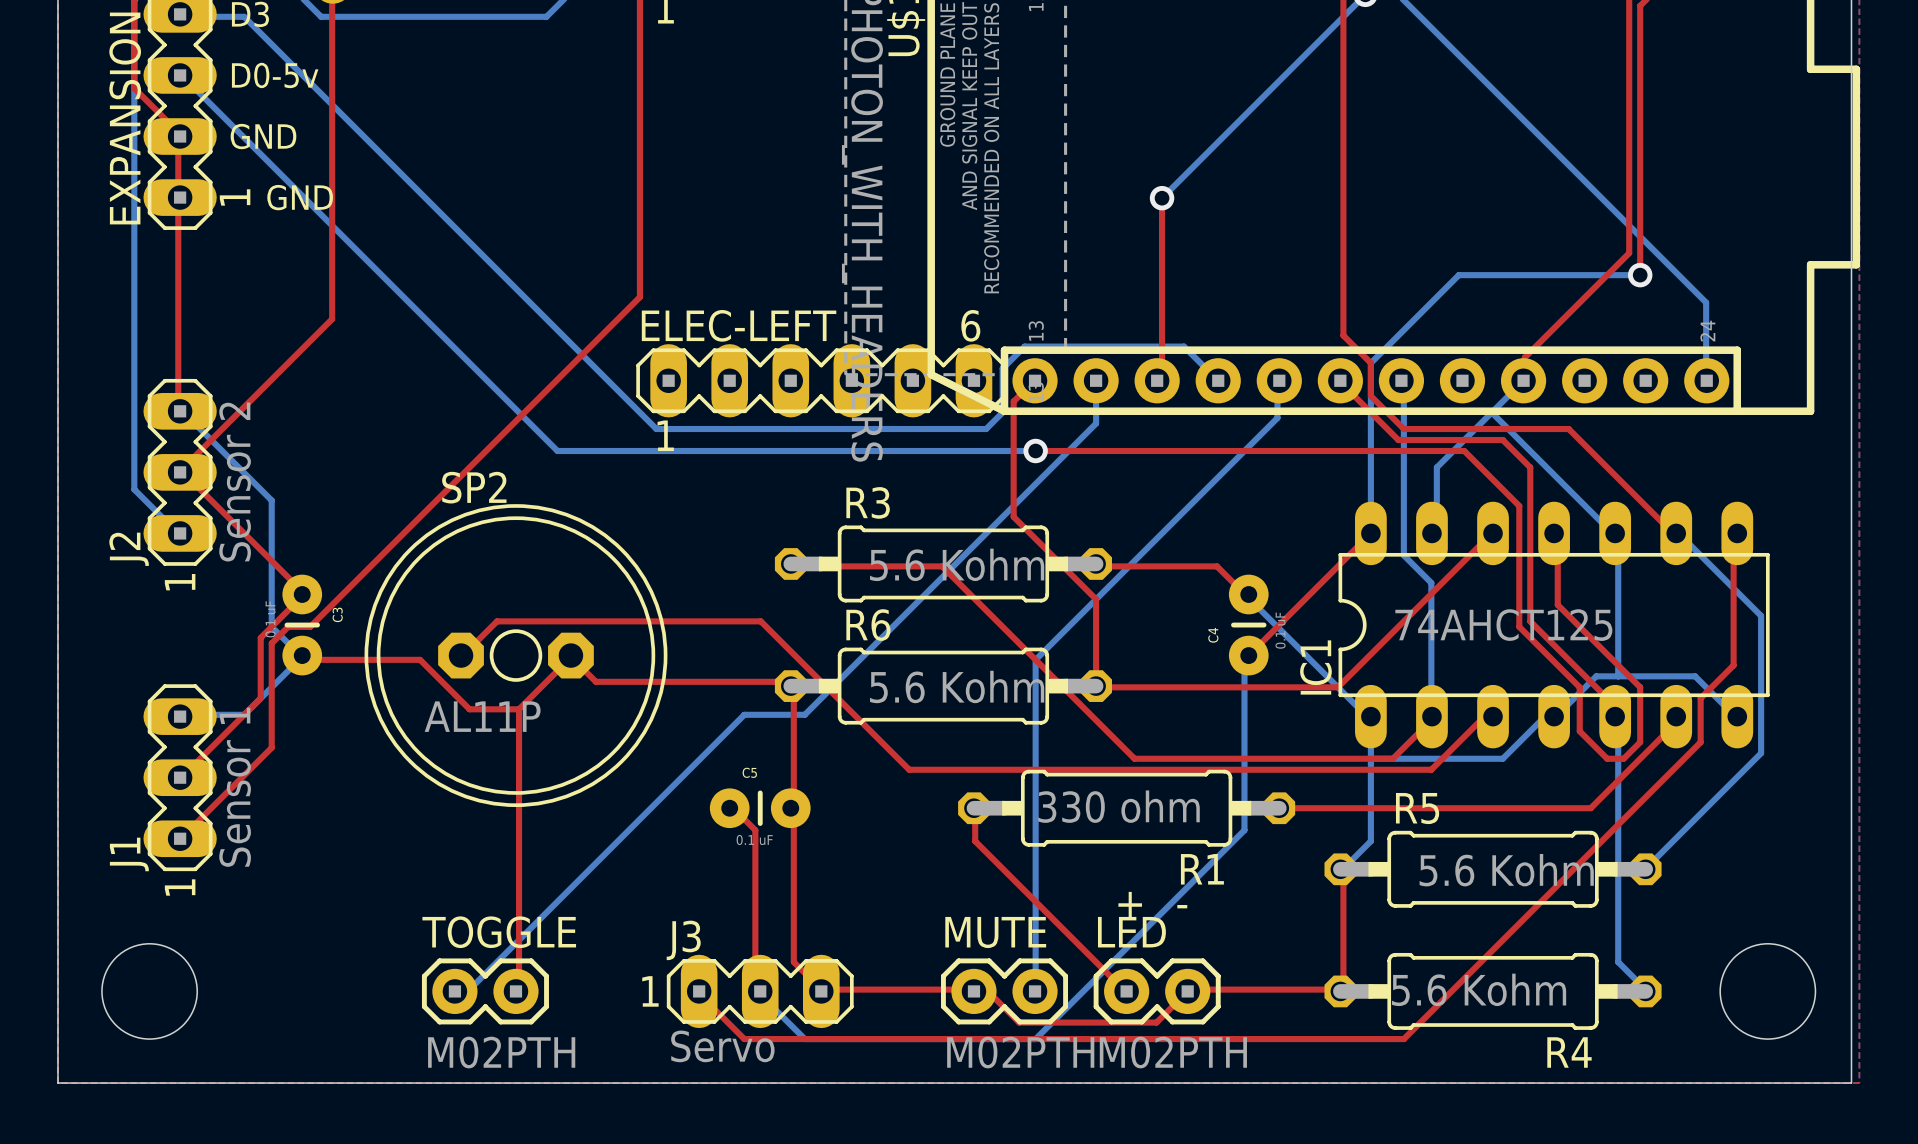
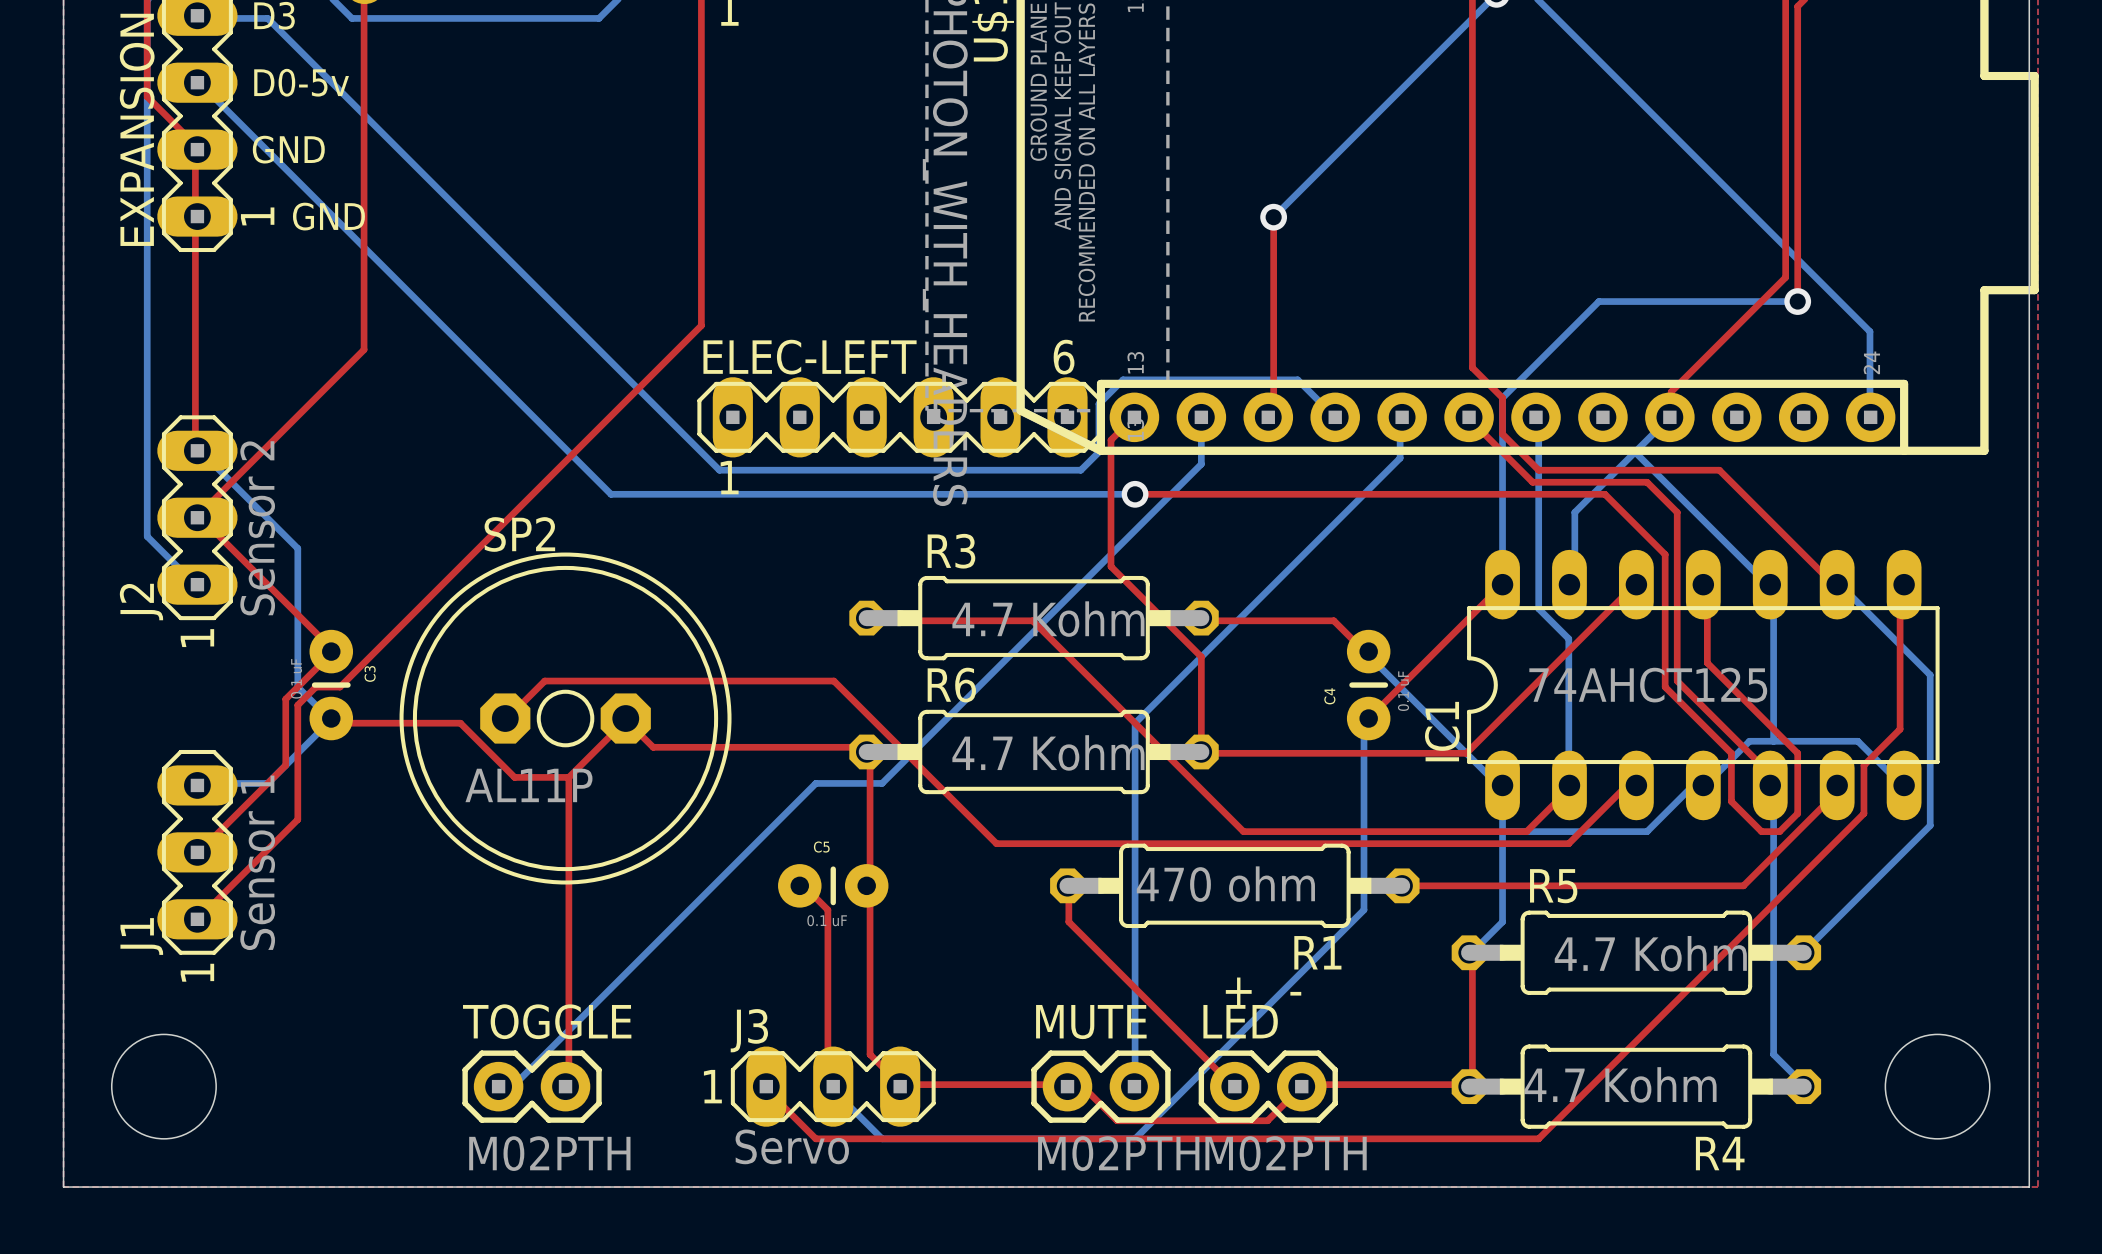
R3 value: 5.6 Kohm (957, 564) -> 4.7 Kohm (1048, 619)
R6 value: 5.6 Kohm (957, 686) -> 4.7 Kohm (1048, 752)
R1 value: 330 ohm (1119, 806) -> 470 ohm (1225, 884)
R5 value: 5.6 Kohm (1506, 870) -> 4.7 Kohm (1650, 953)
R4 value: 5.6 Kohm (1479, 989) -> 4.7 Kohm (1620, 1084)

